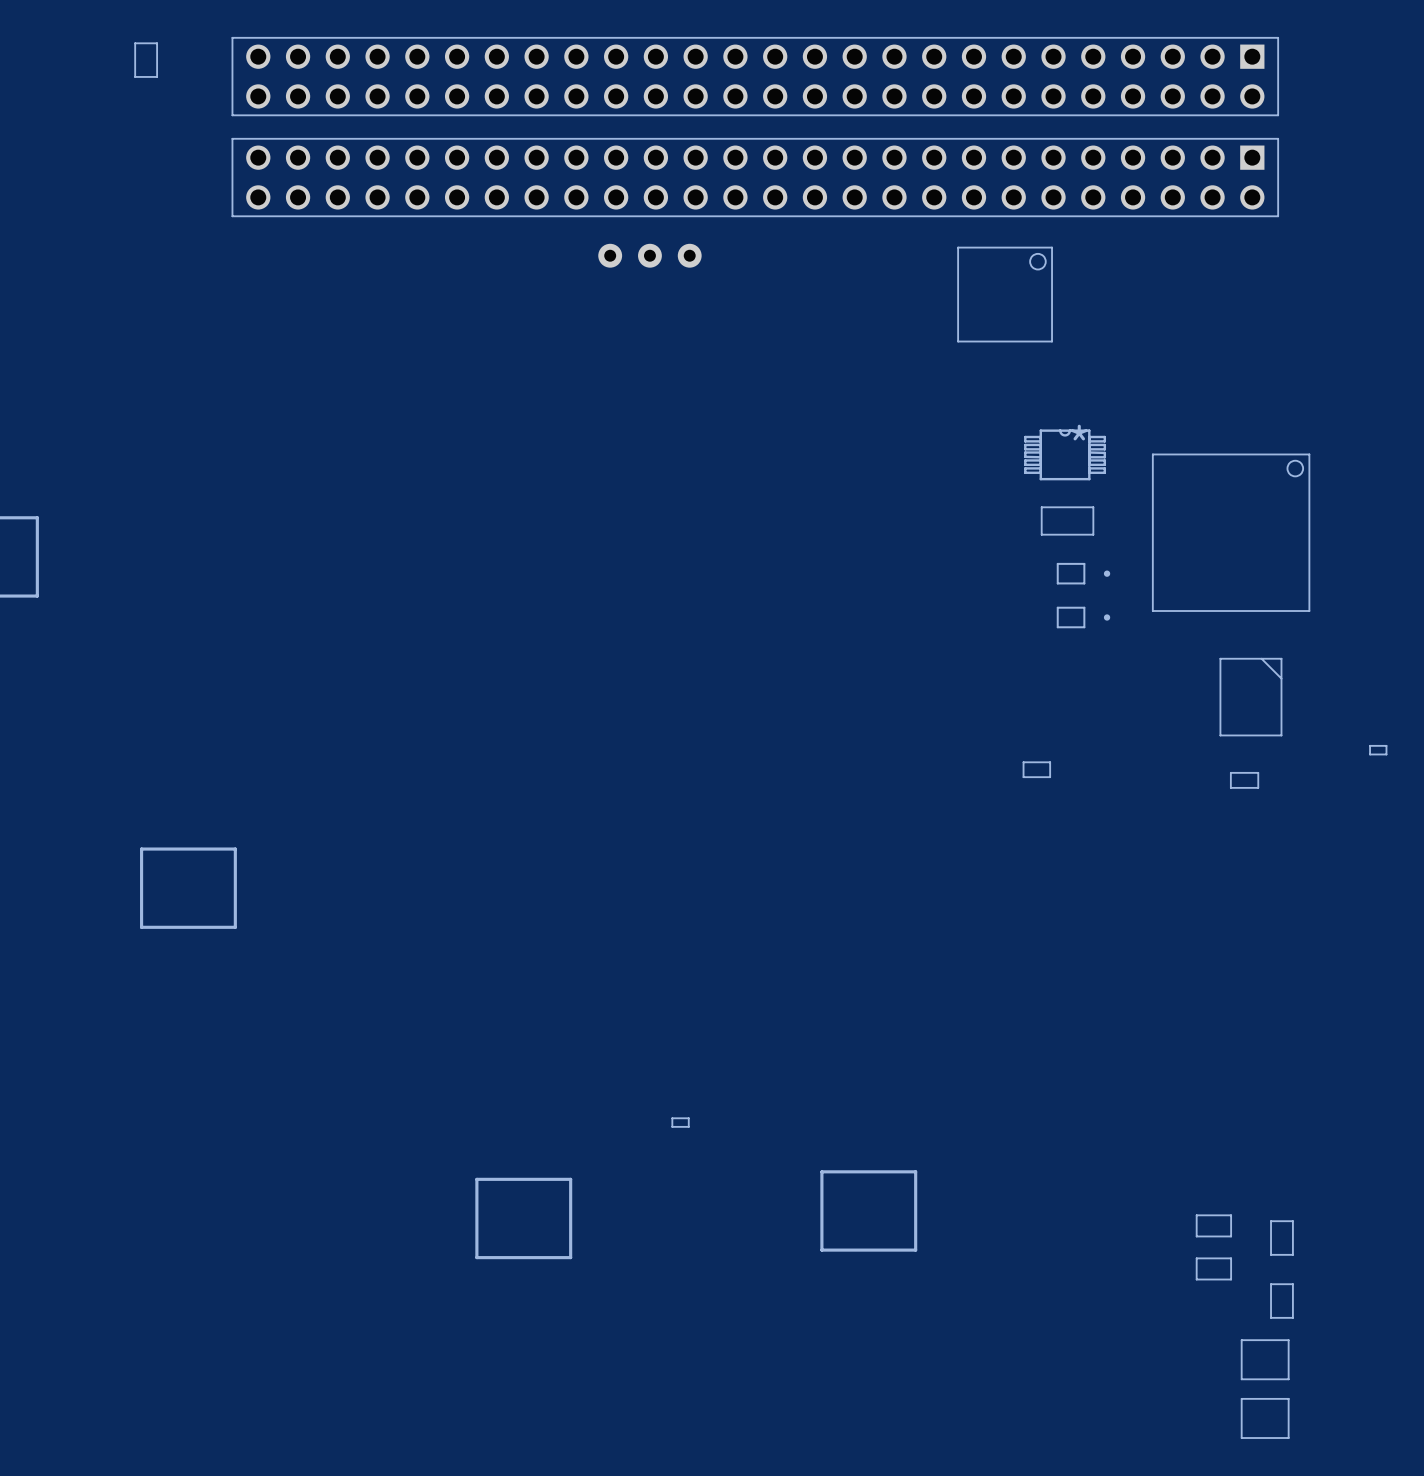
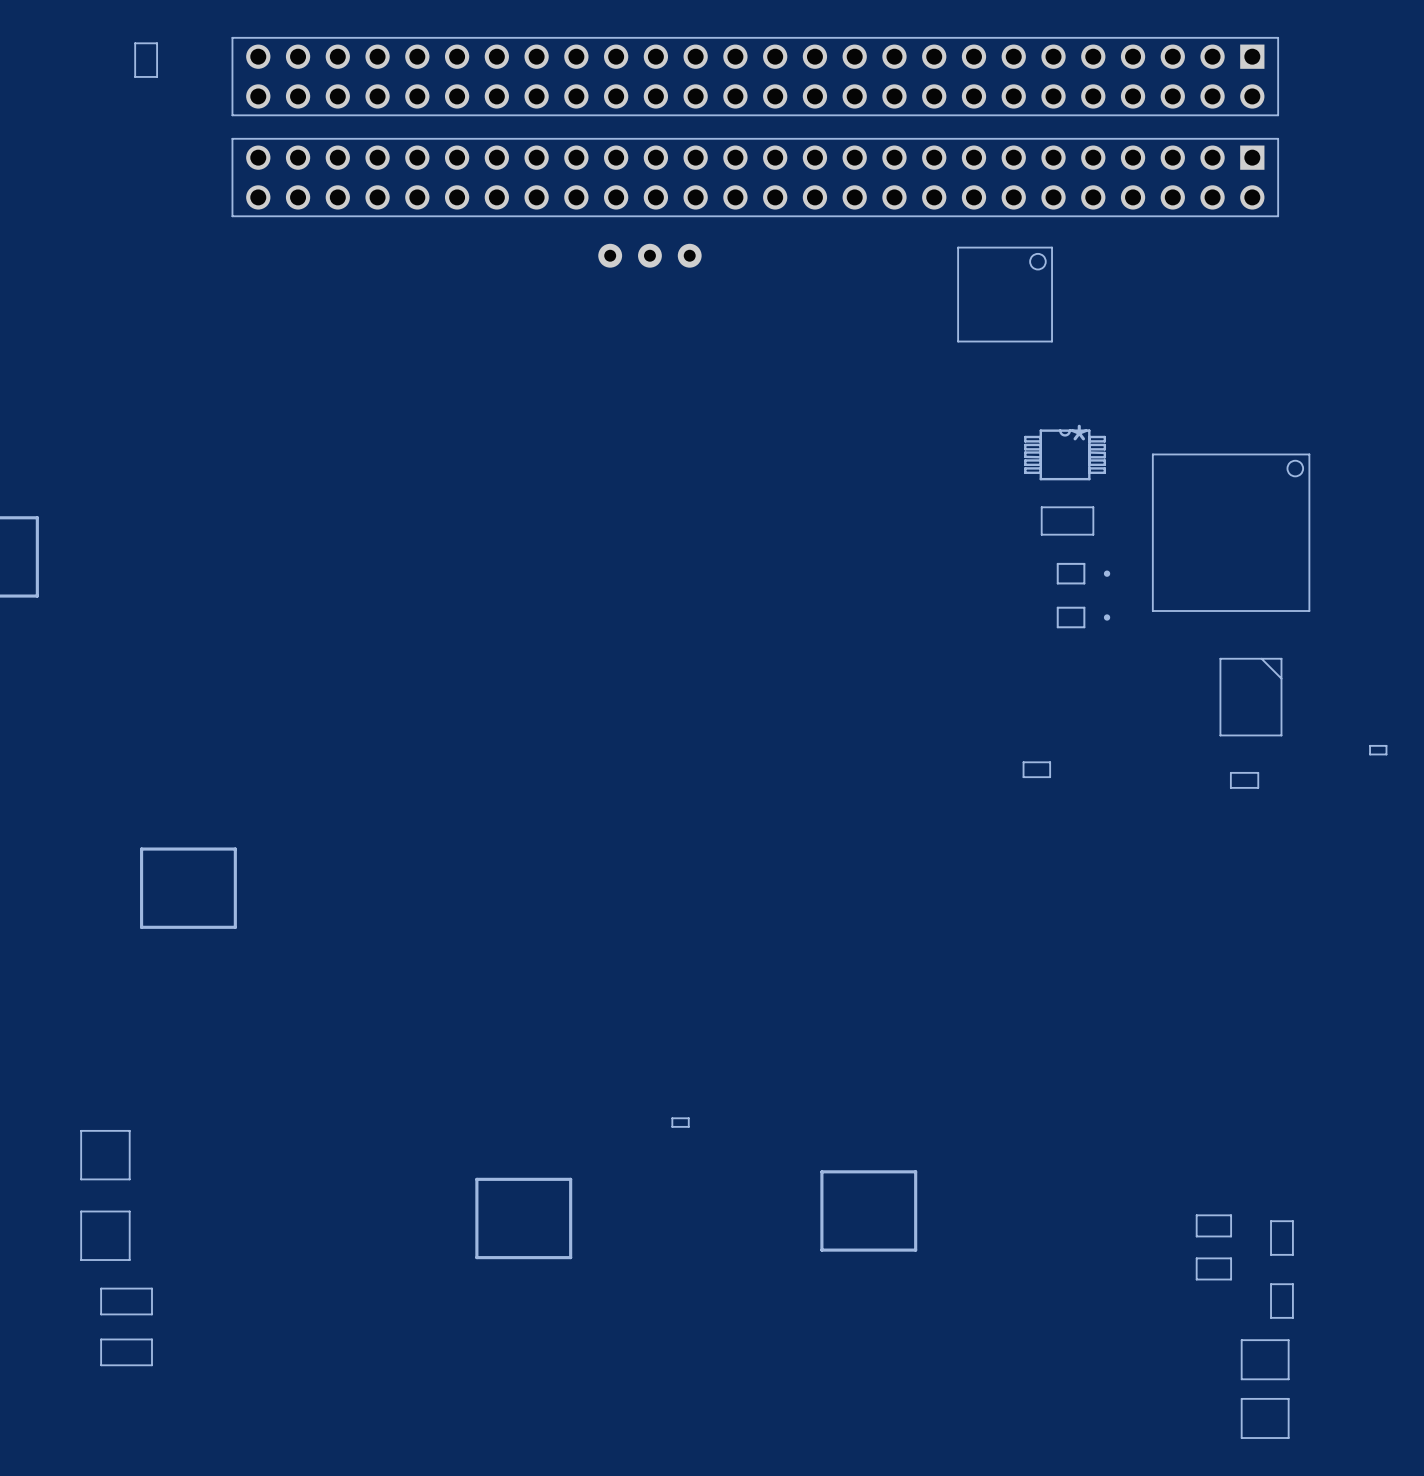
part: none -> (105, 1155)
part: none -> (105, 1235)
part: none -> (126, 1301)
part: none -> (126, 1352)

